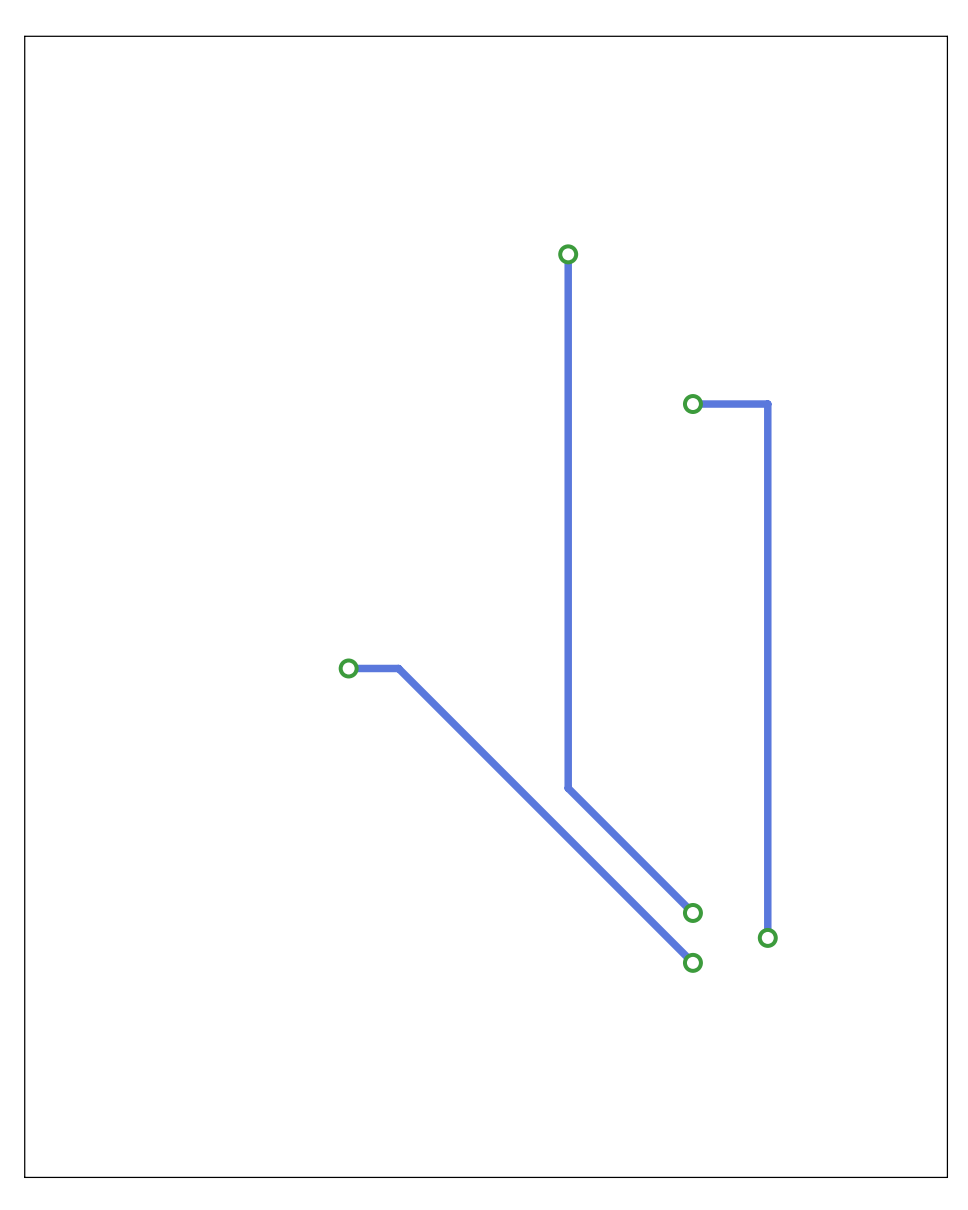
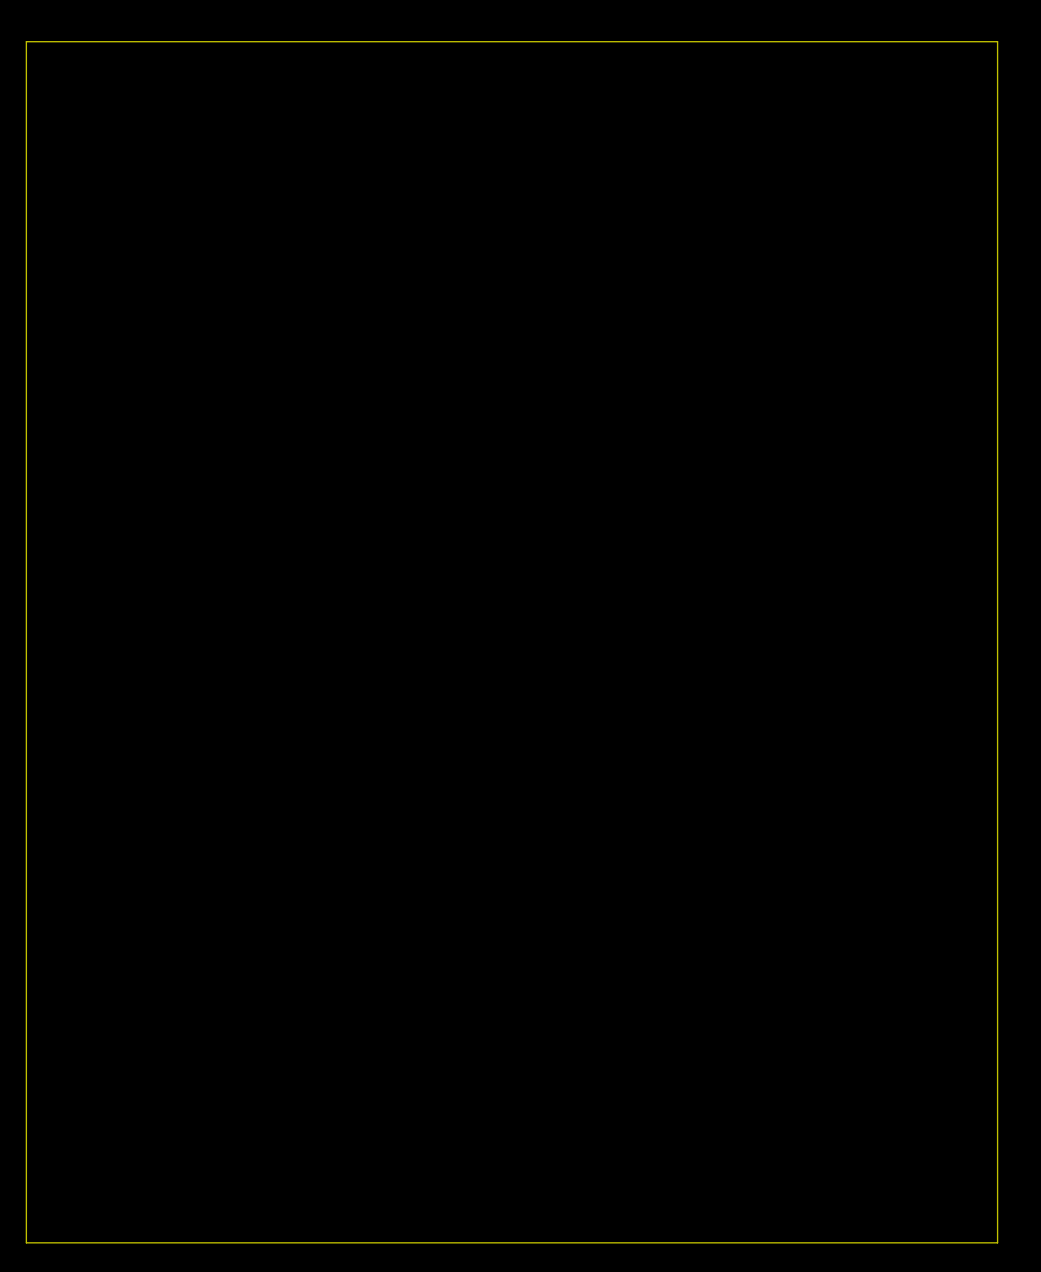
track: (568, 254) (568, 788) (692, 912) -> none
via: (568, 254) -> none
track: (692, 404) (767, 404) (767, 937) -> none
via: (692, 404) -> none
track: (348, 668) (398, 668) (692, 962) -> none
via: (348, 668) -> none
via: (692, 912) -> none
via: (767, 937) -> none
via: (692, 962) -> none

